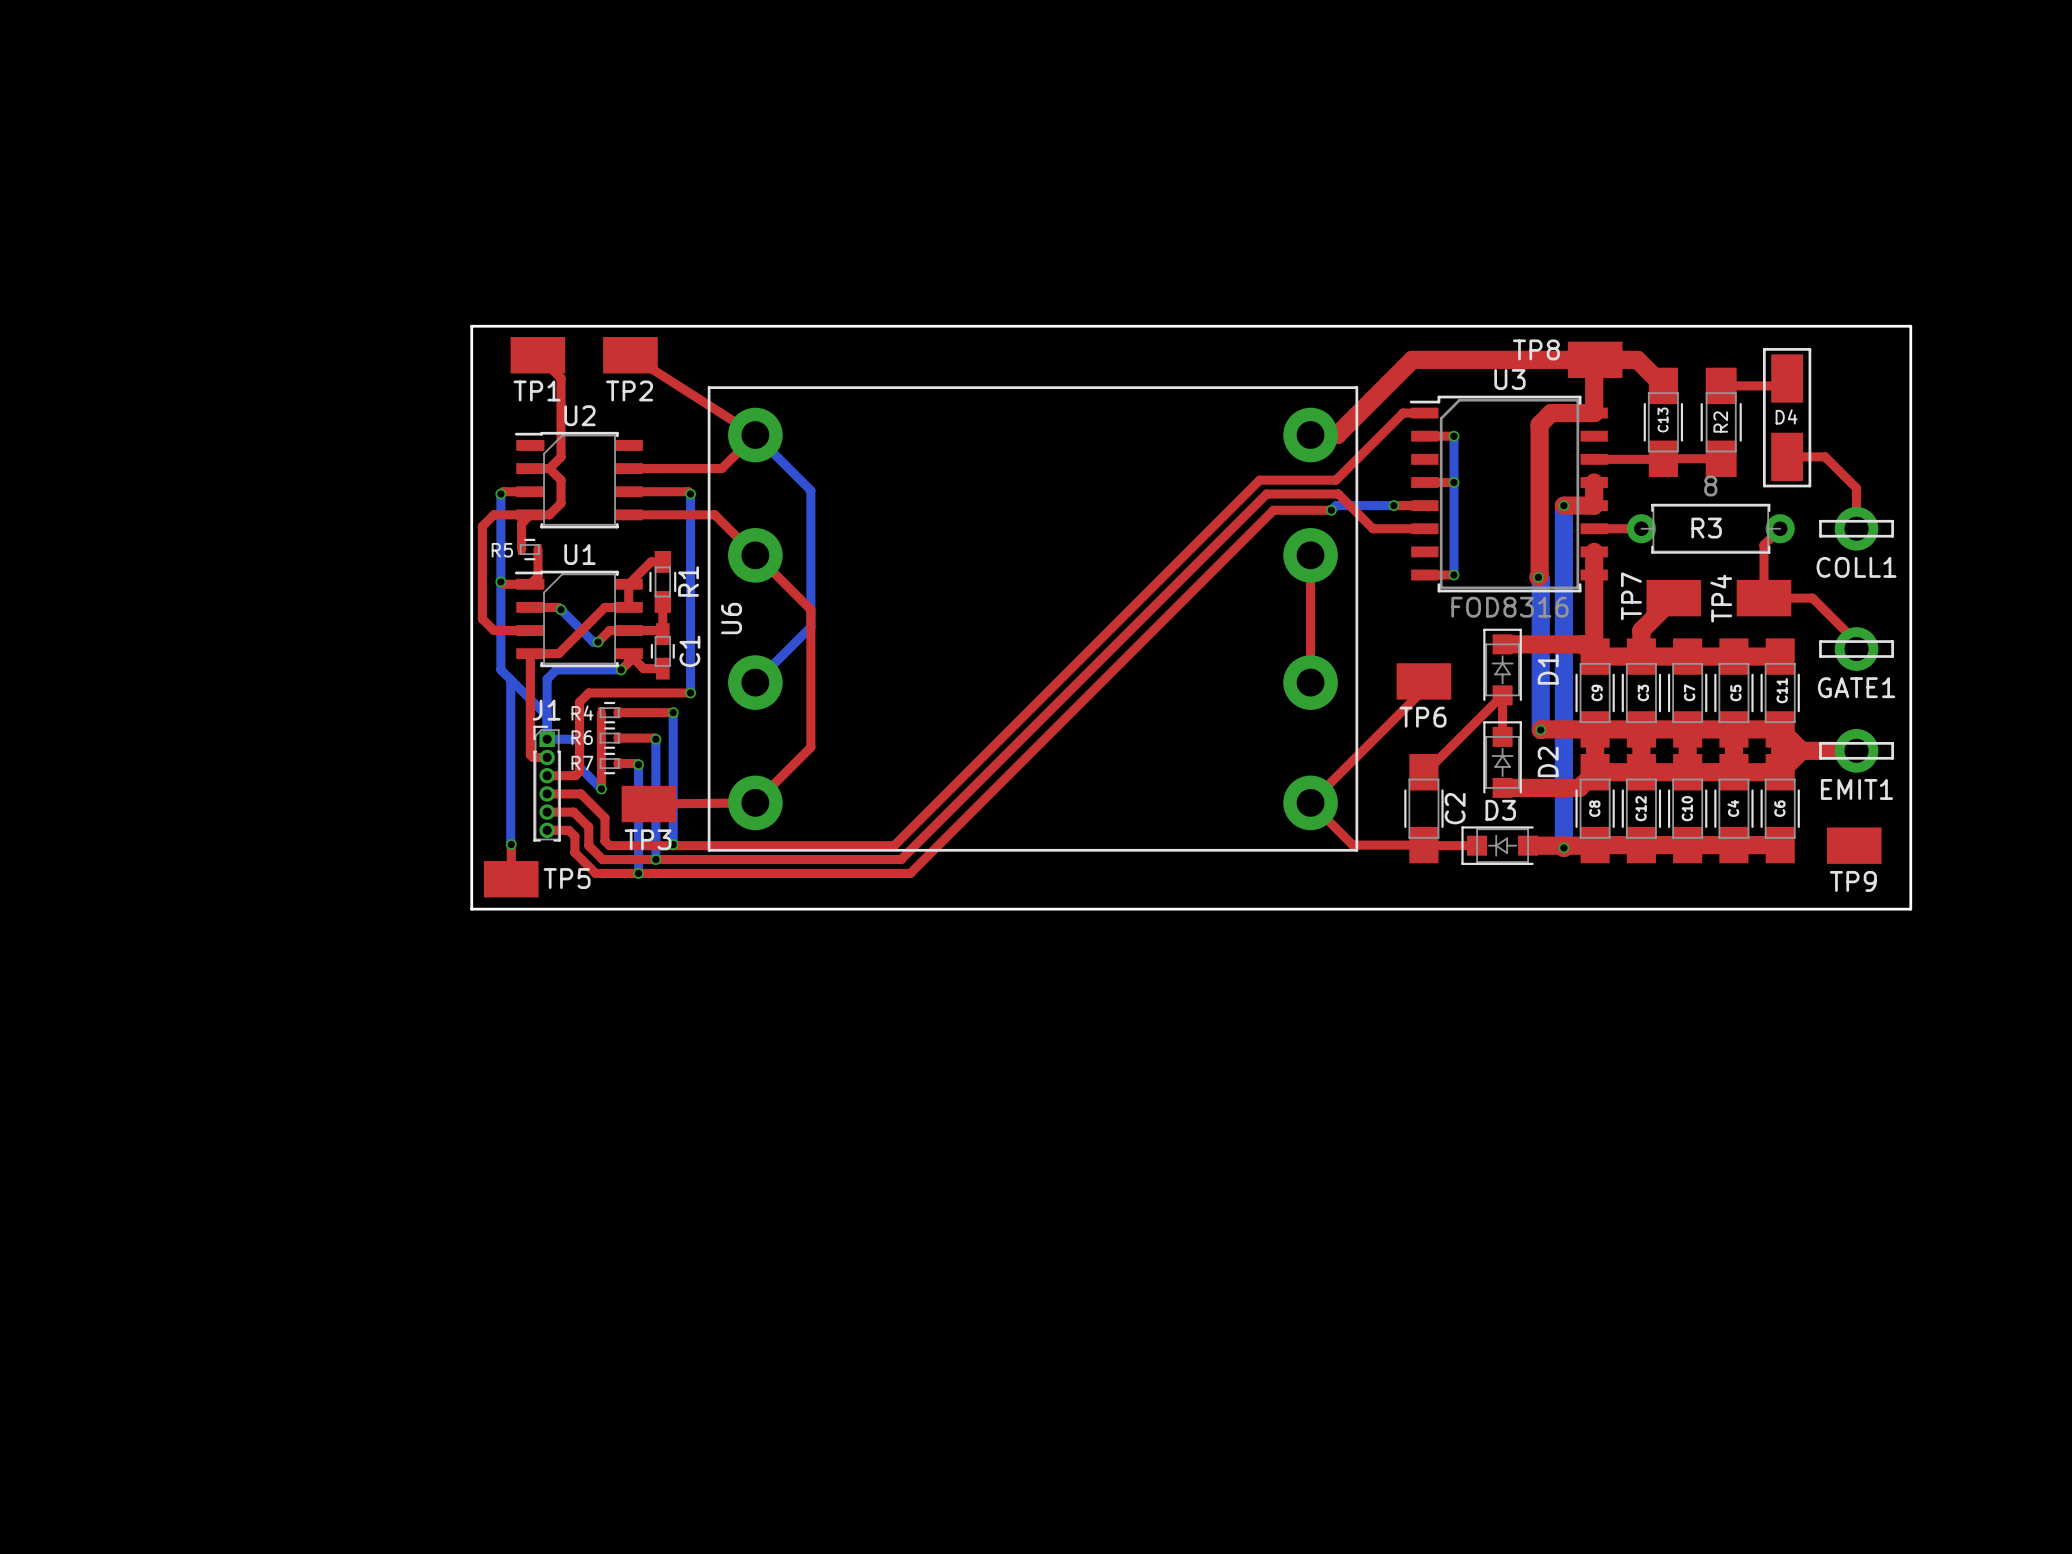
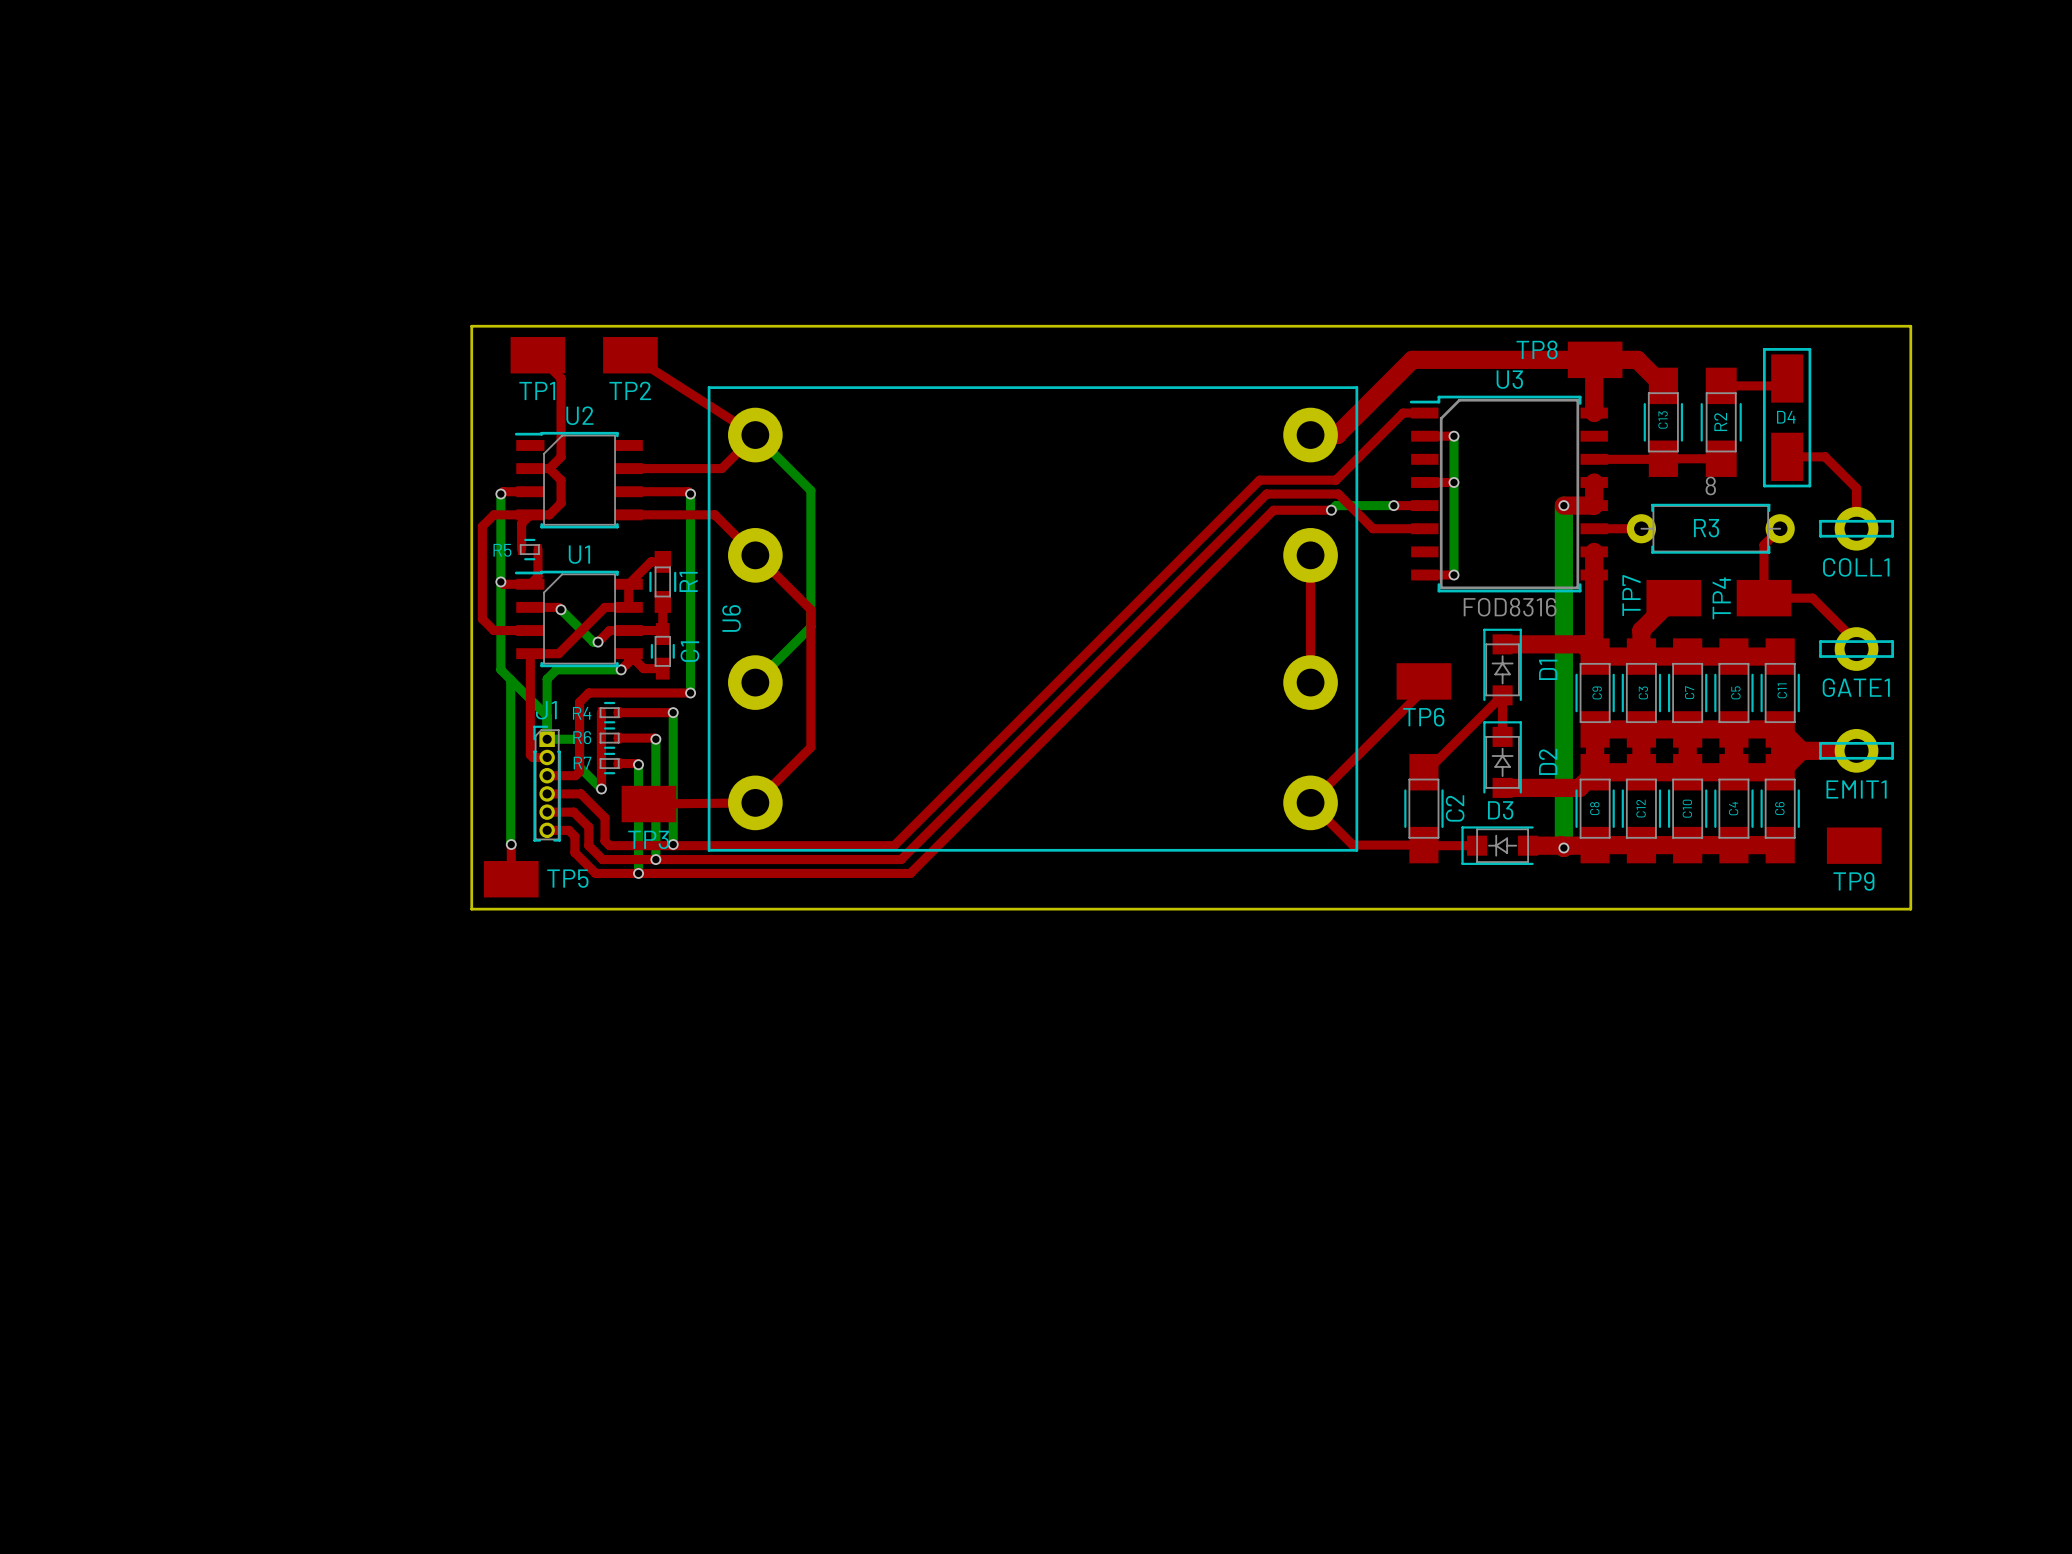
top track: (1594, 413) (1551, 413) (1539, 424) (1538, 577) -> none
bottom track: (1538, 577) (1540, 579) (1540, 730) -> none
via: (1538, 577) -> none
top track: (1595, 729) (1540, 730) -> none
via: (1540, 730) -> none

